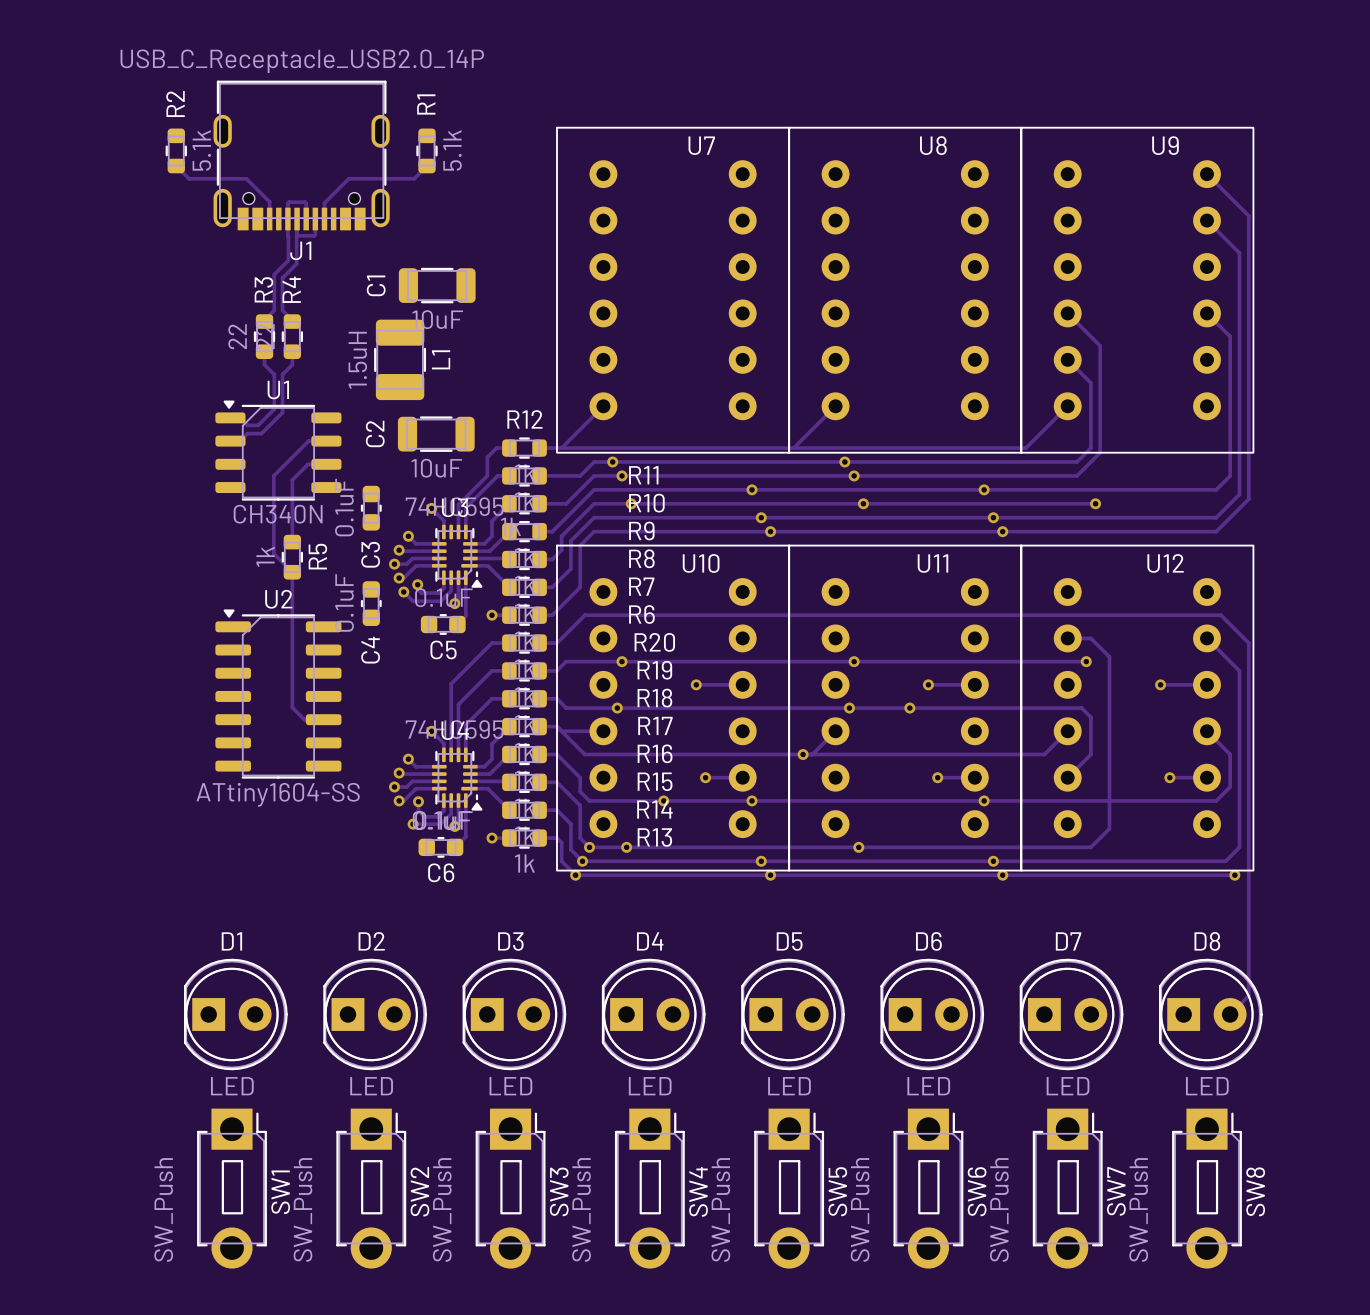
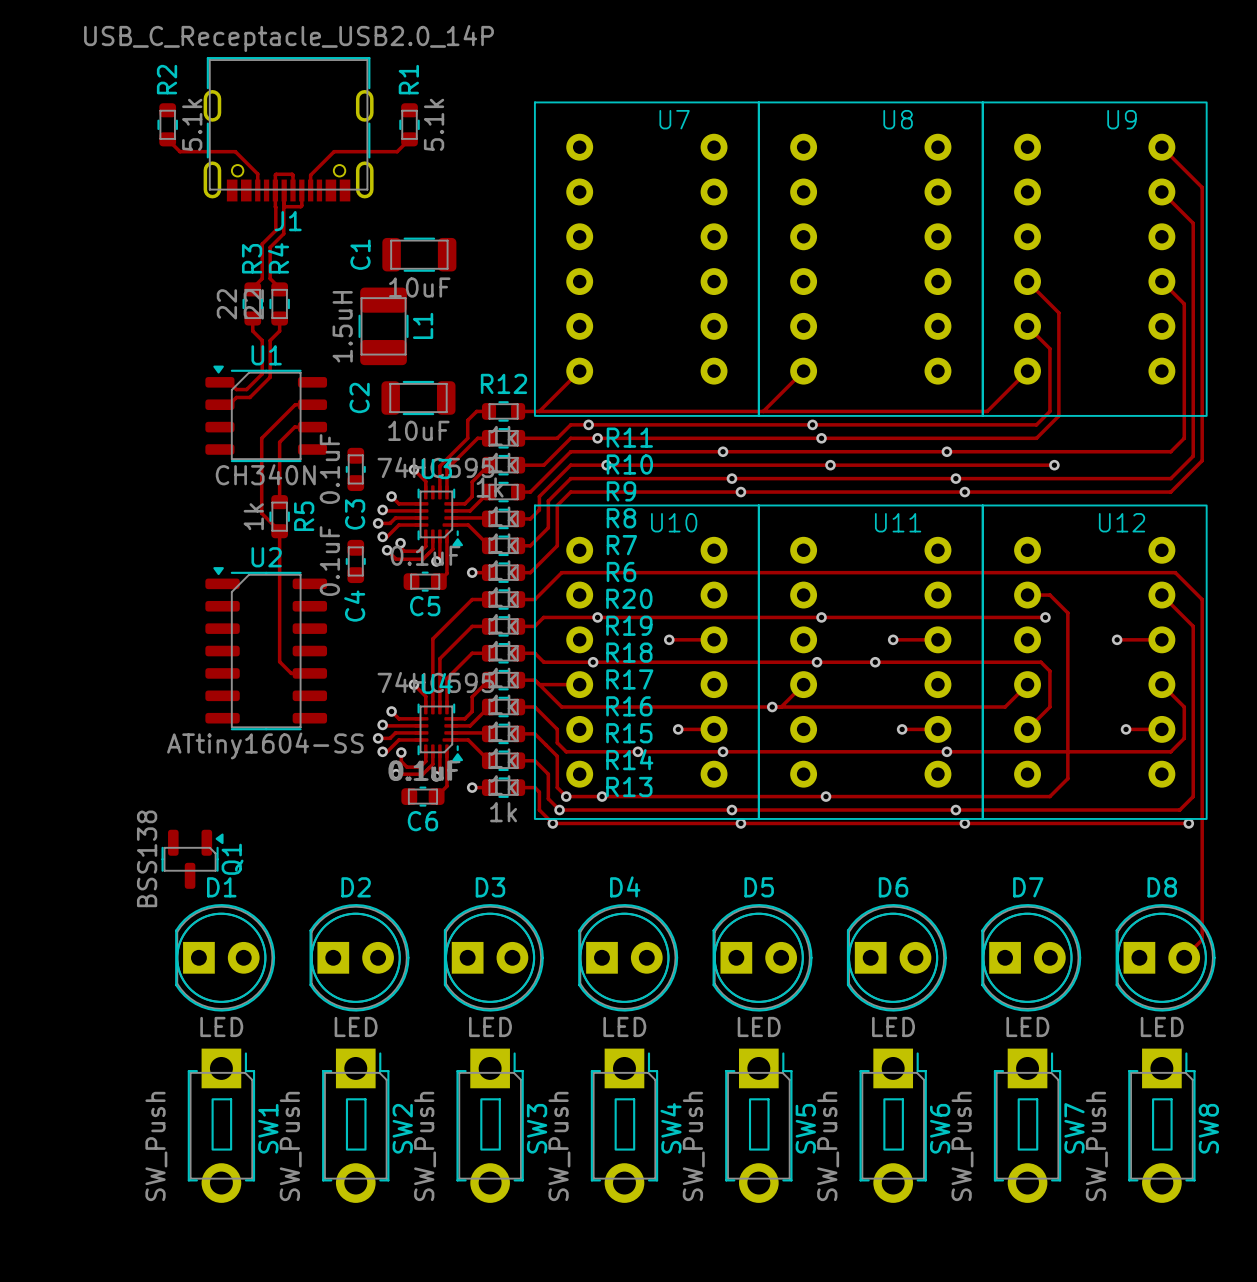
Q1: none -> BSS138 (192, 859)

